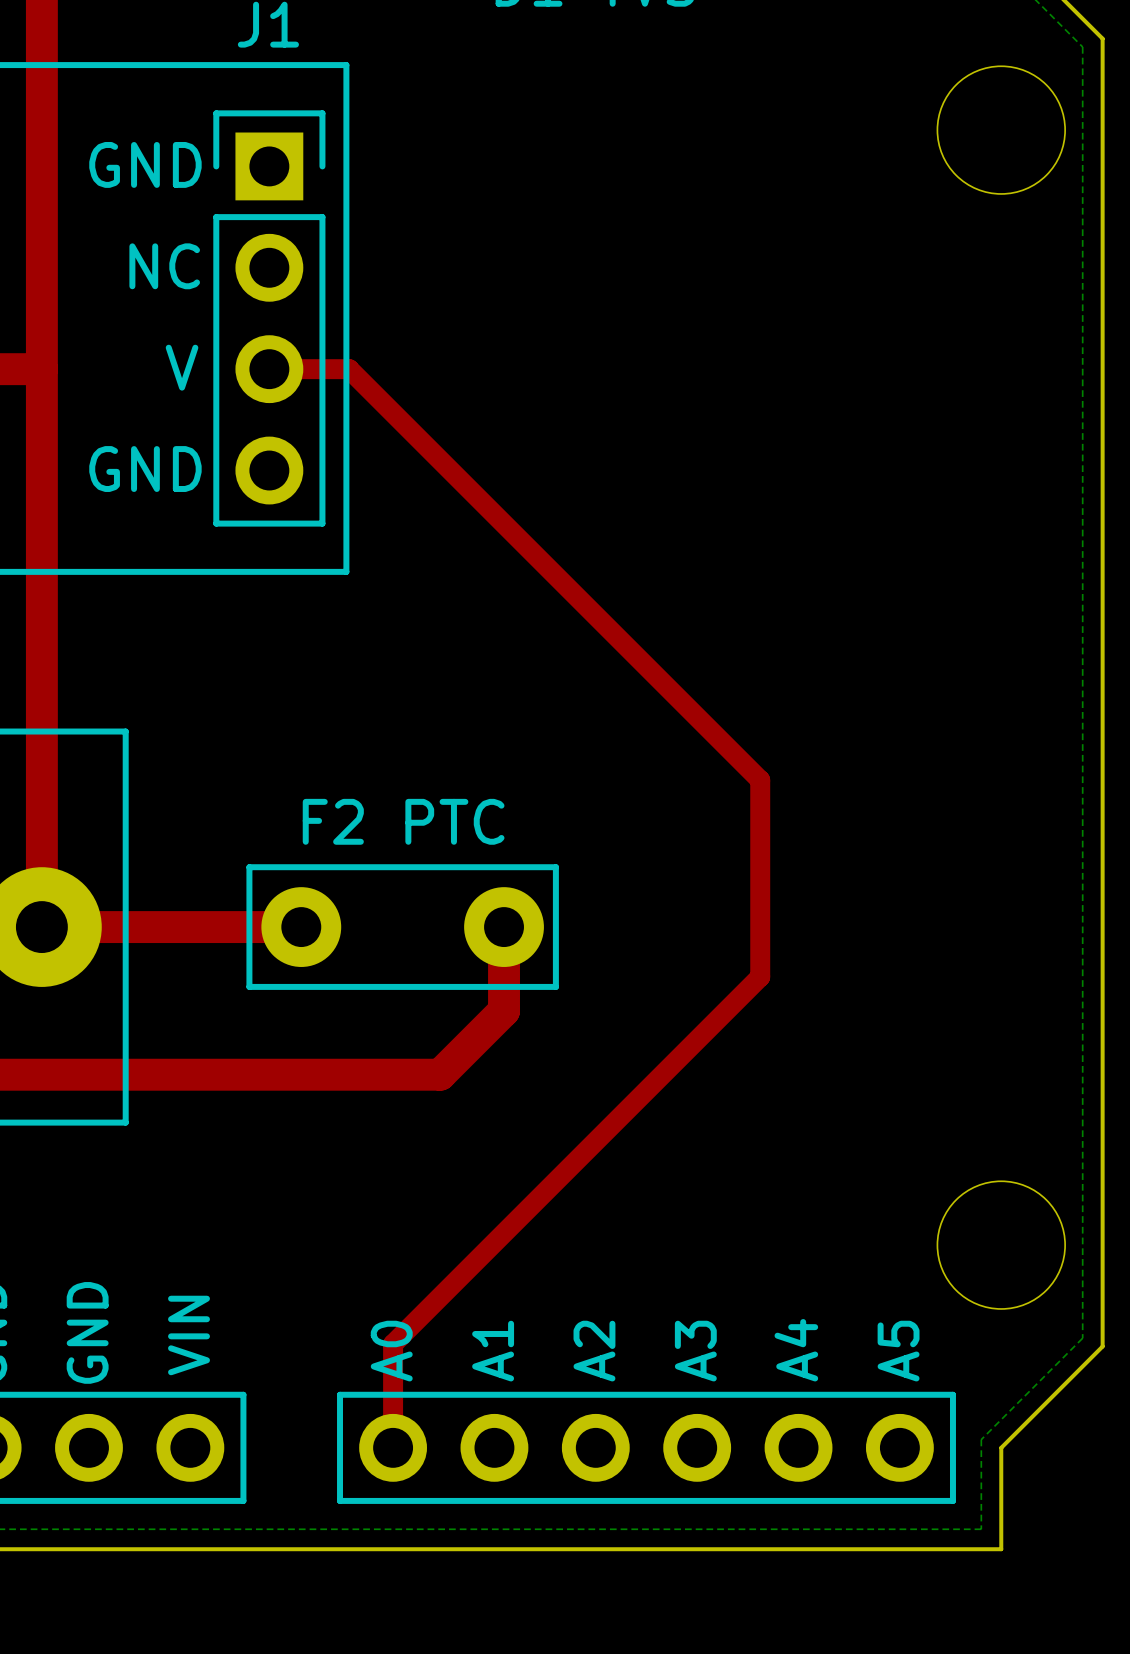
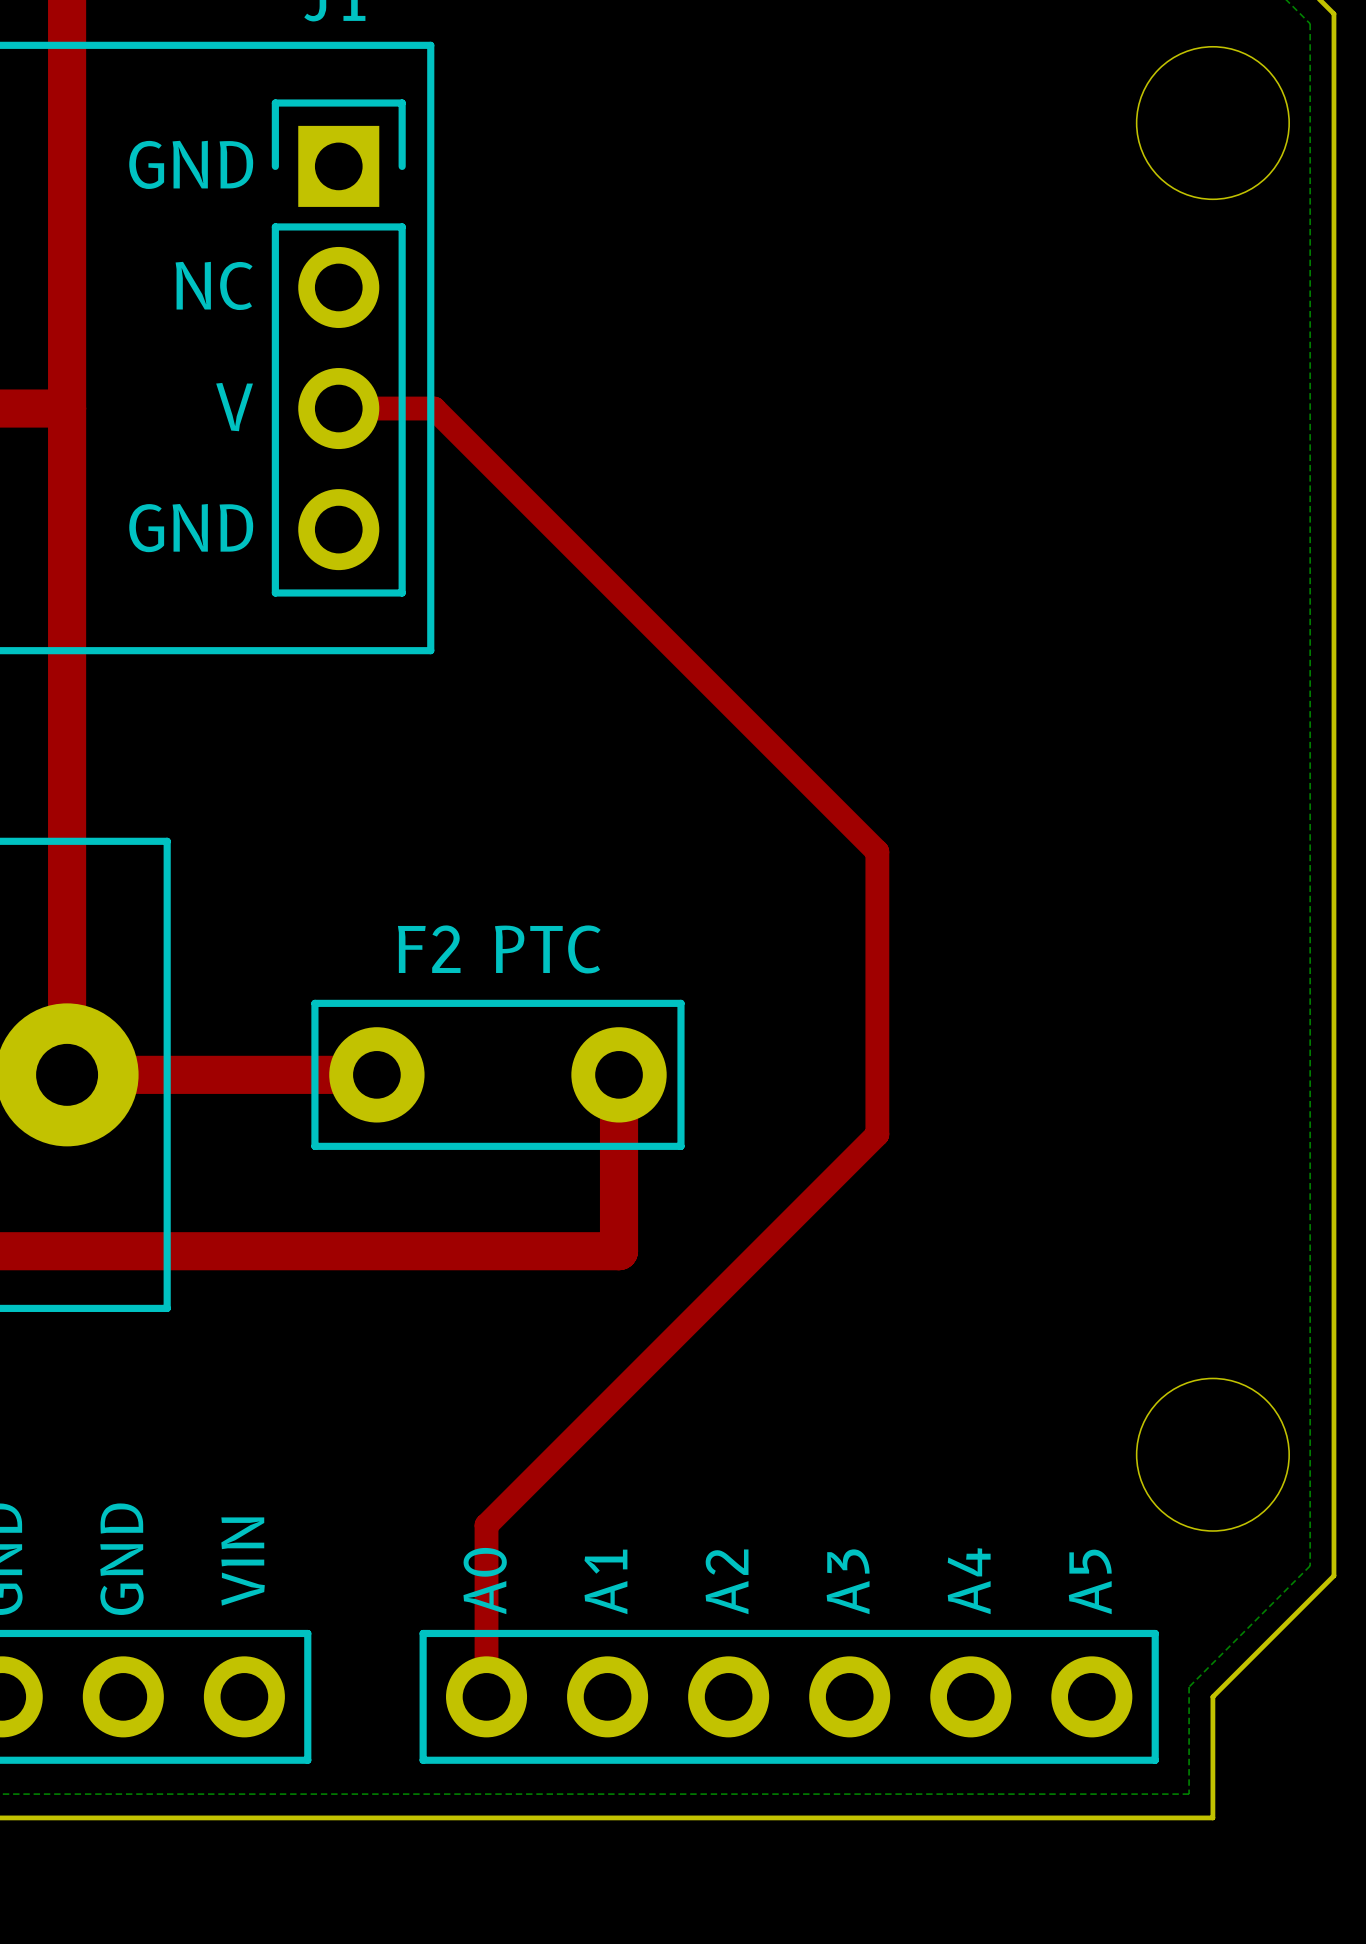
top track: (720, 740) (760, 780) (760, 976) (393, 1344) -> (877, 851) (877, 1134) (486, 1525) (486, 1572)
top track: (504, 1010) (440, 1074) -> (619, 1174) (619, 1251) (542, 1251)

